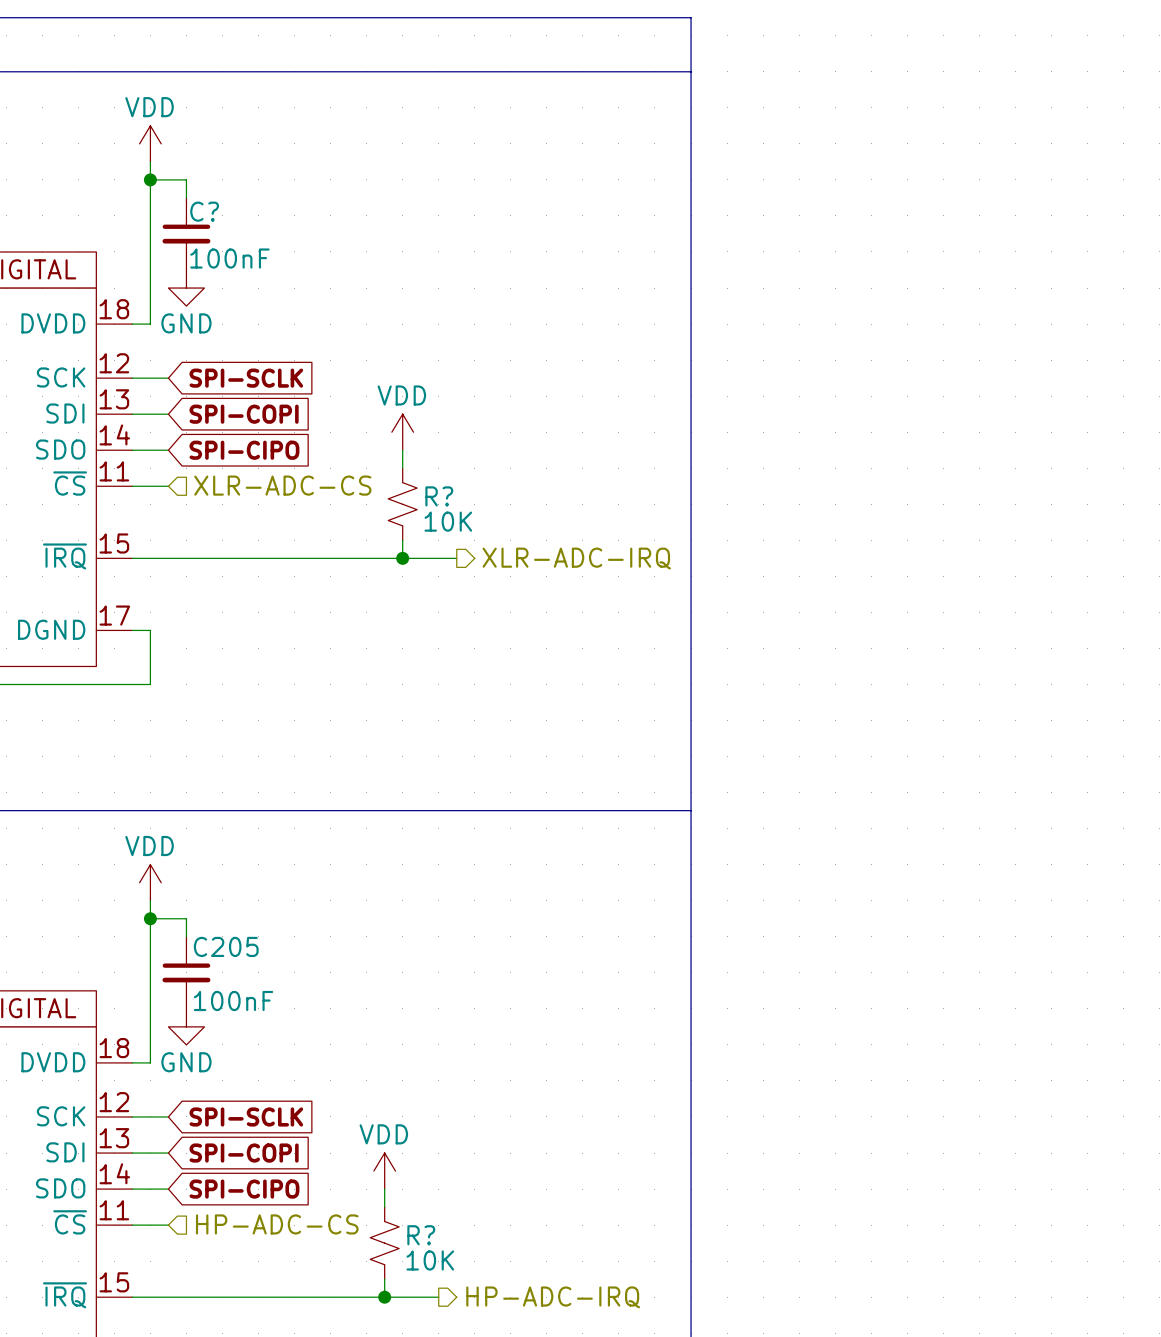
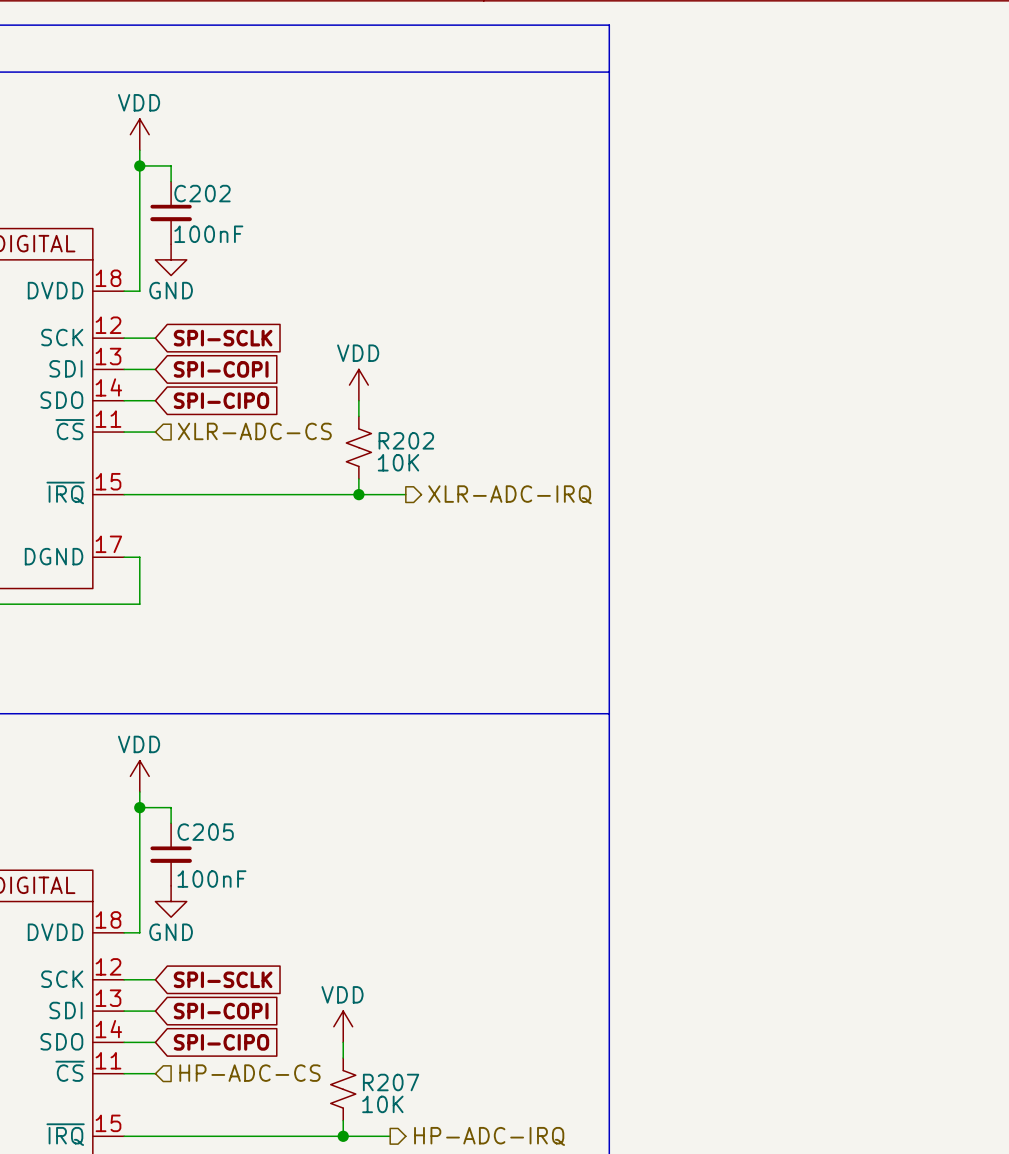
C? name: C? (204, 211) -> C202 (202, 193)
R? name: R? (439, 496) -> R202 (406, 440)
R? name: R? (421, 1235) -> R207 (391, 1082)

